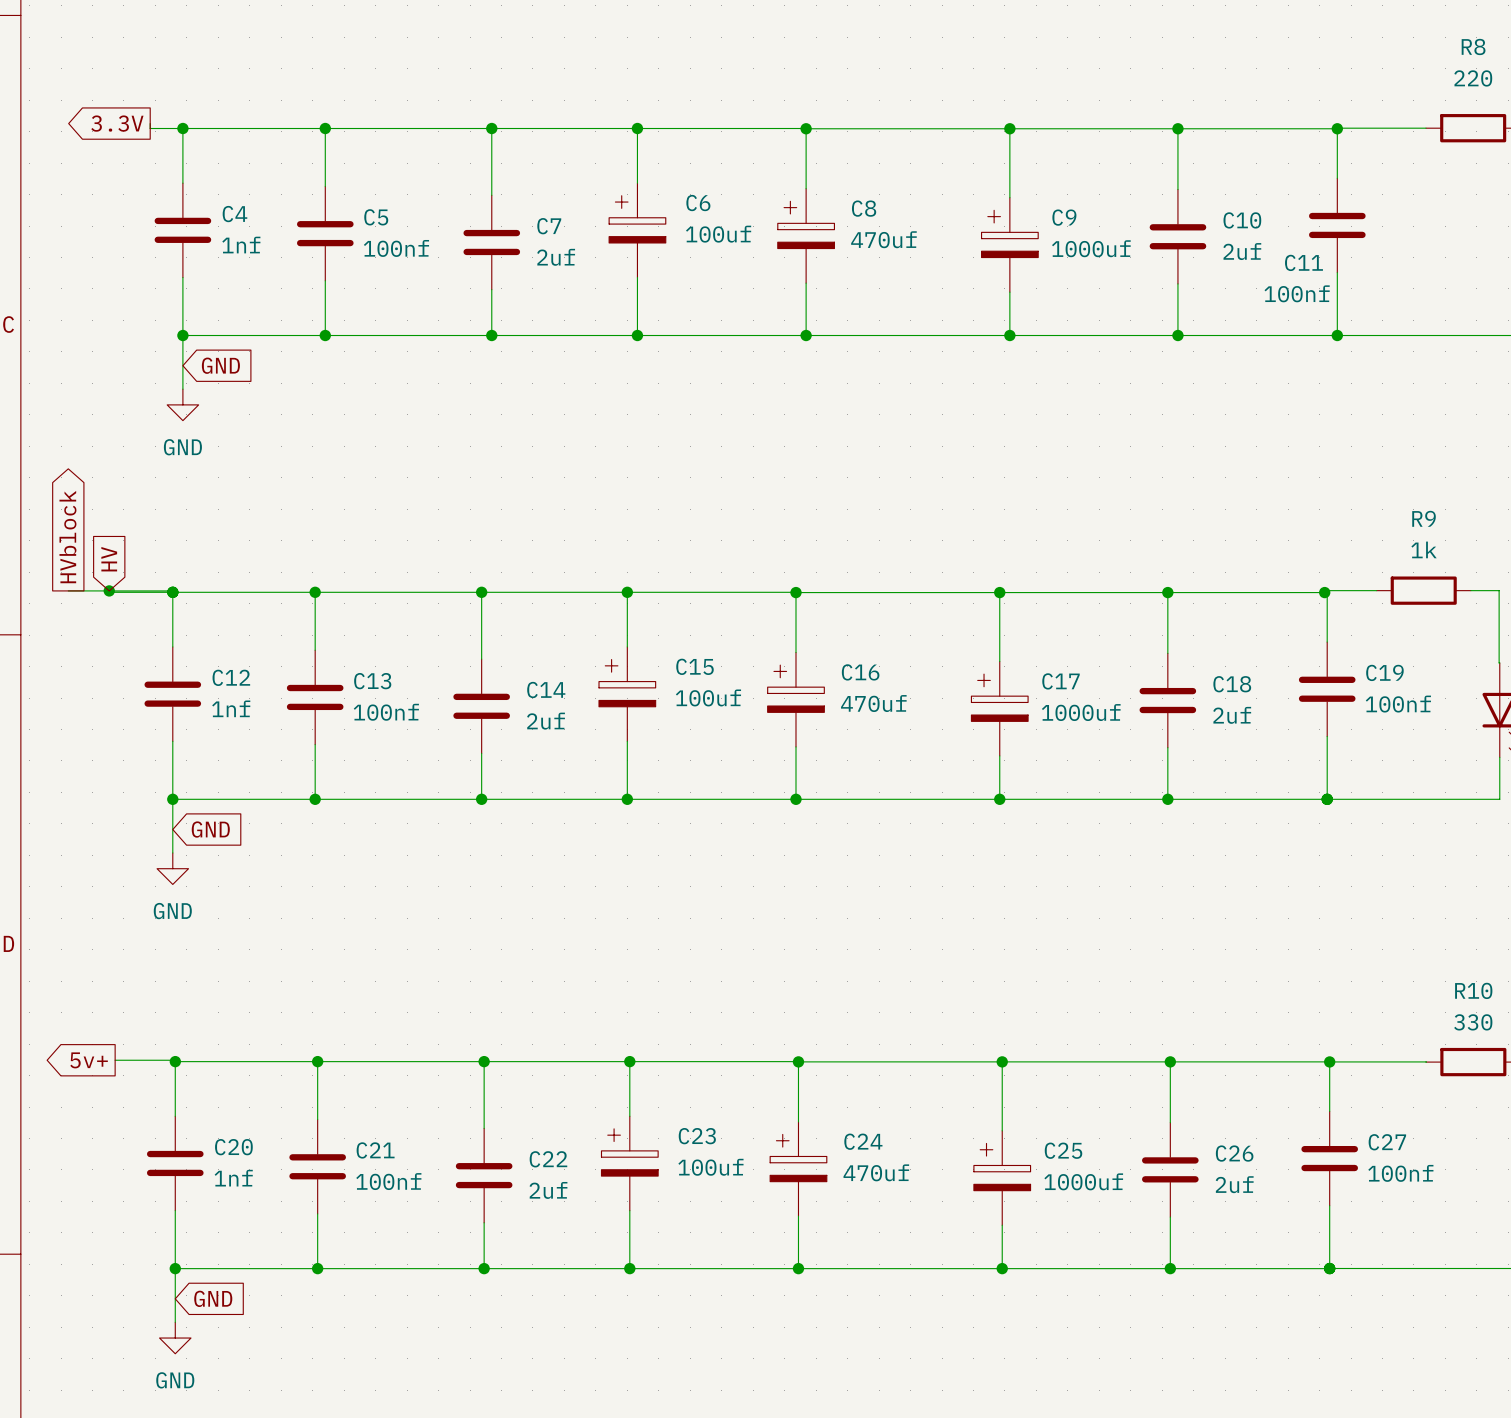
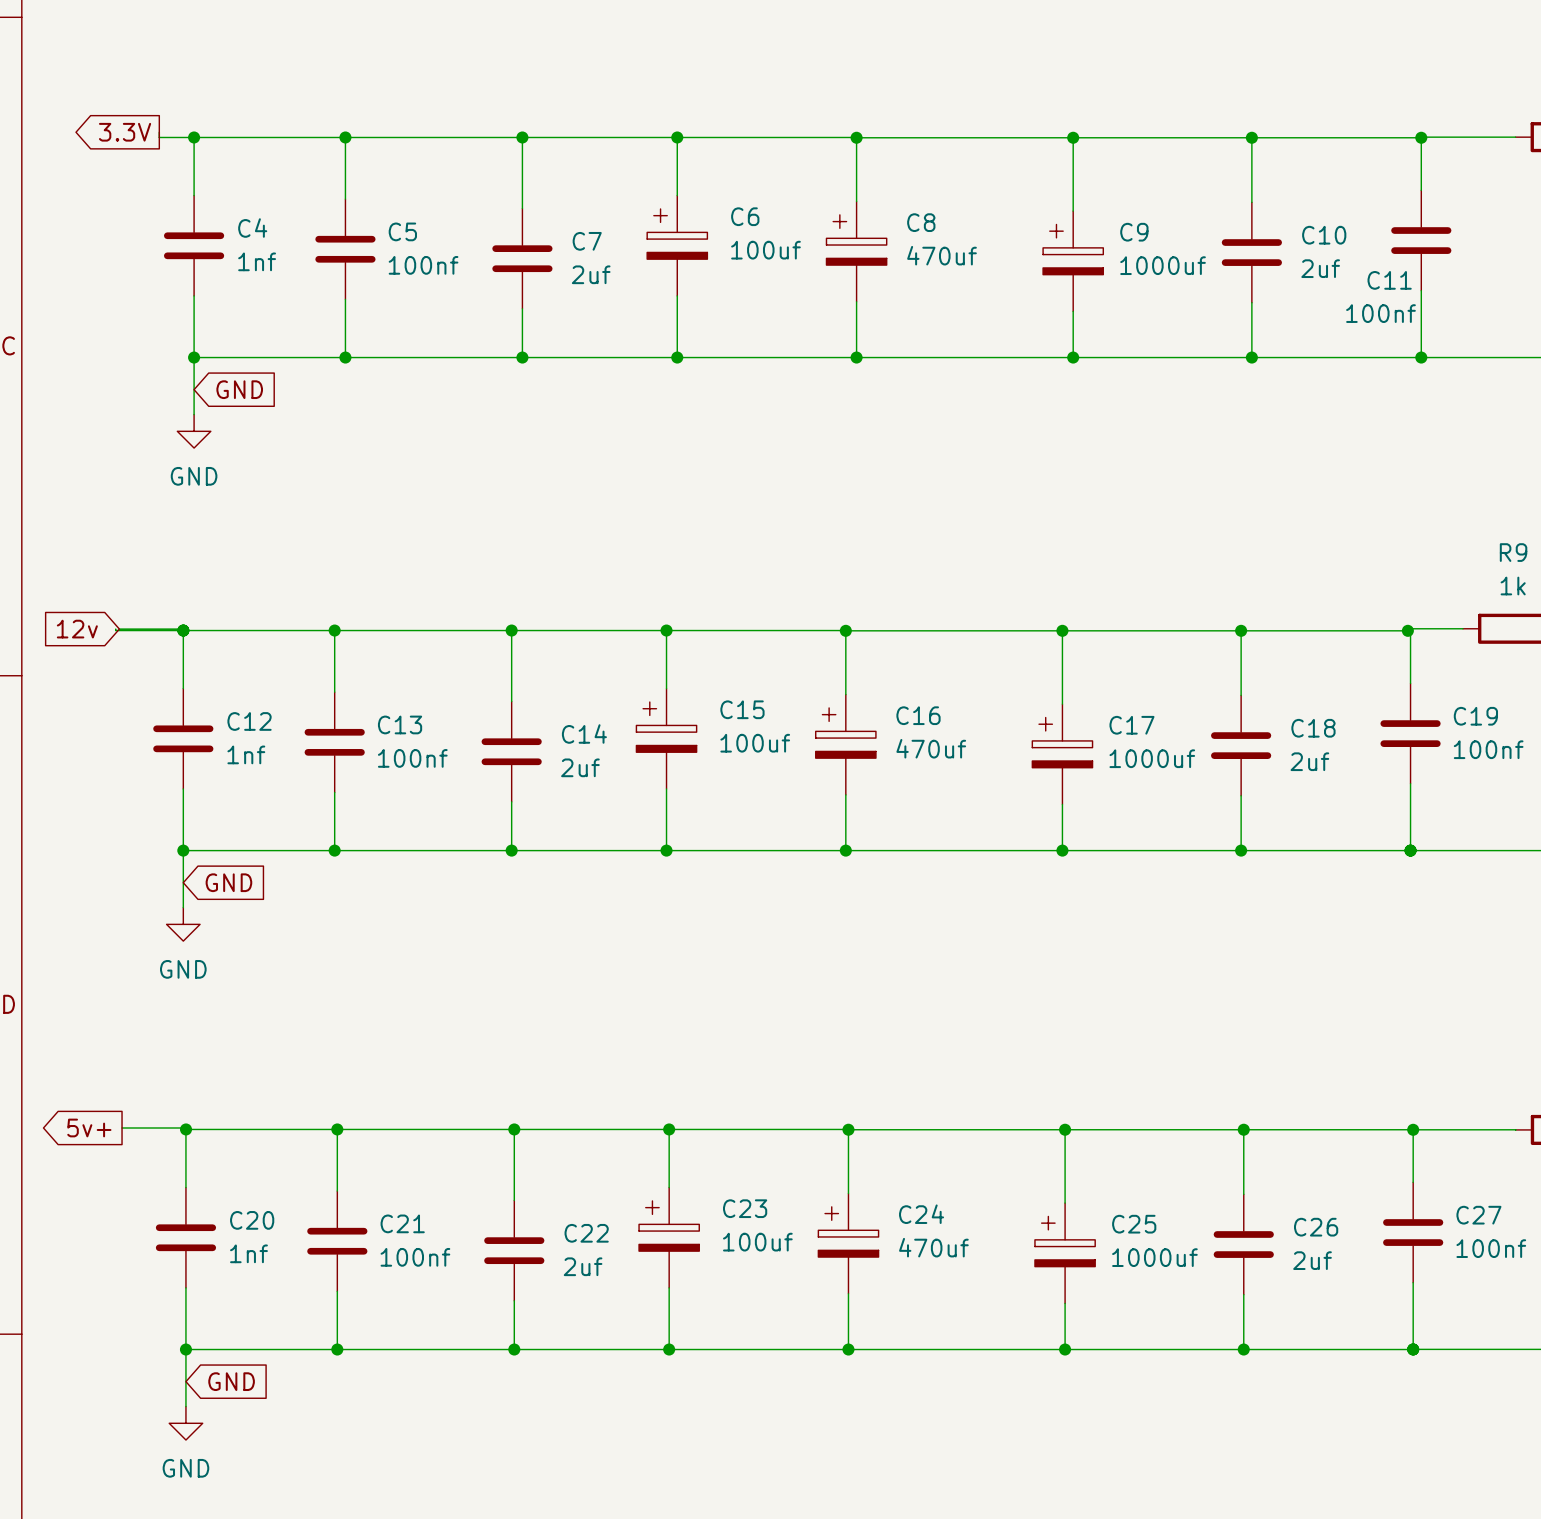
global label: HVblock (67, 537) -> none
global label: HV (109, 559) -> 12v (77, 629)
wire: (68, 590) (112, 590) -> none
junction: (109, 590) -> none

